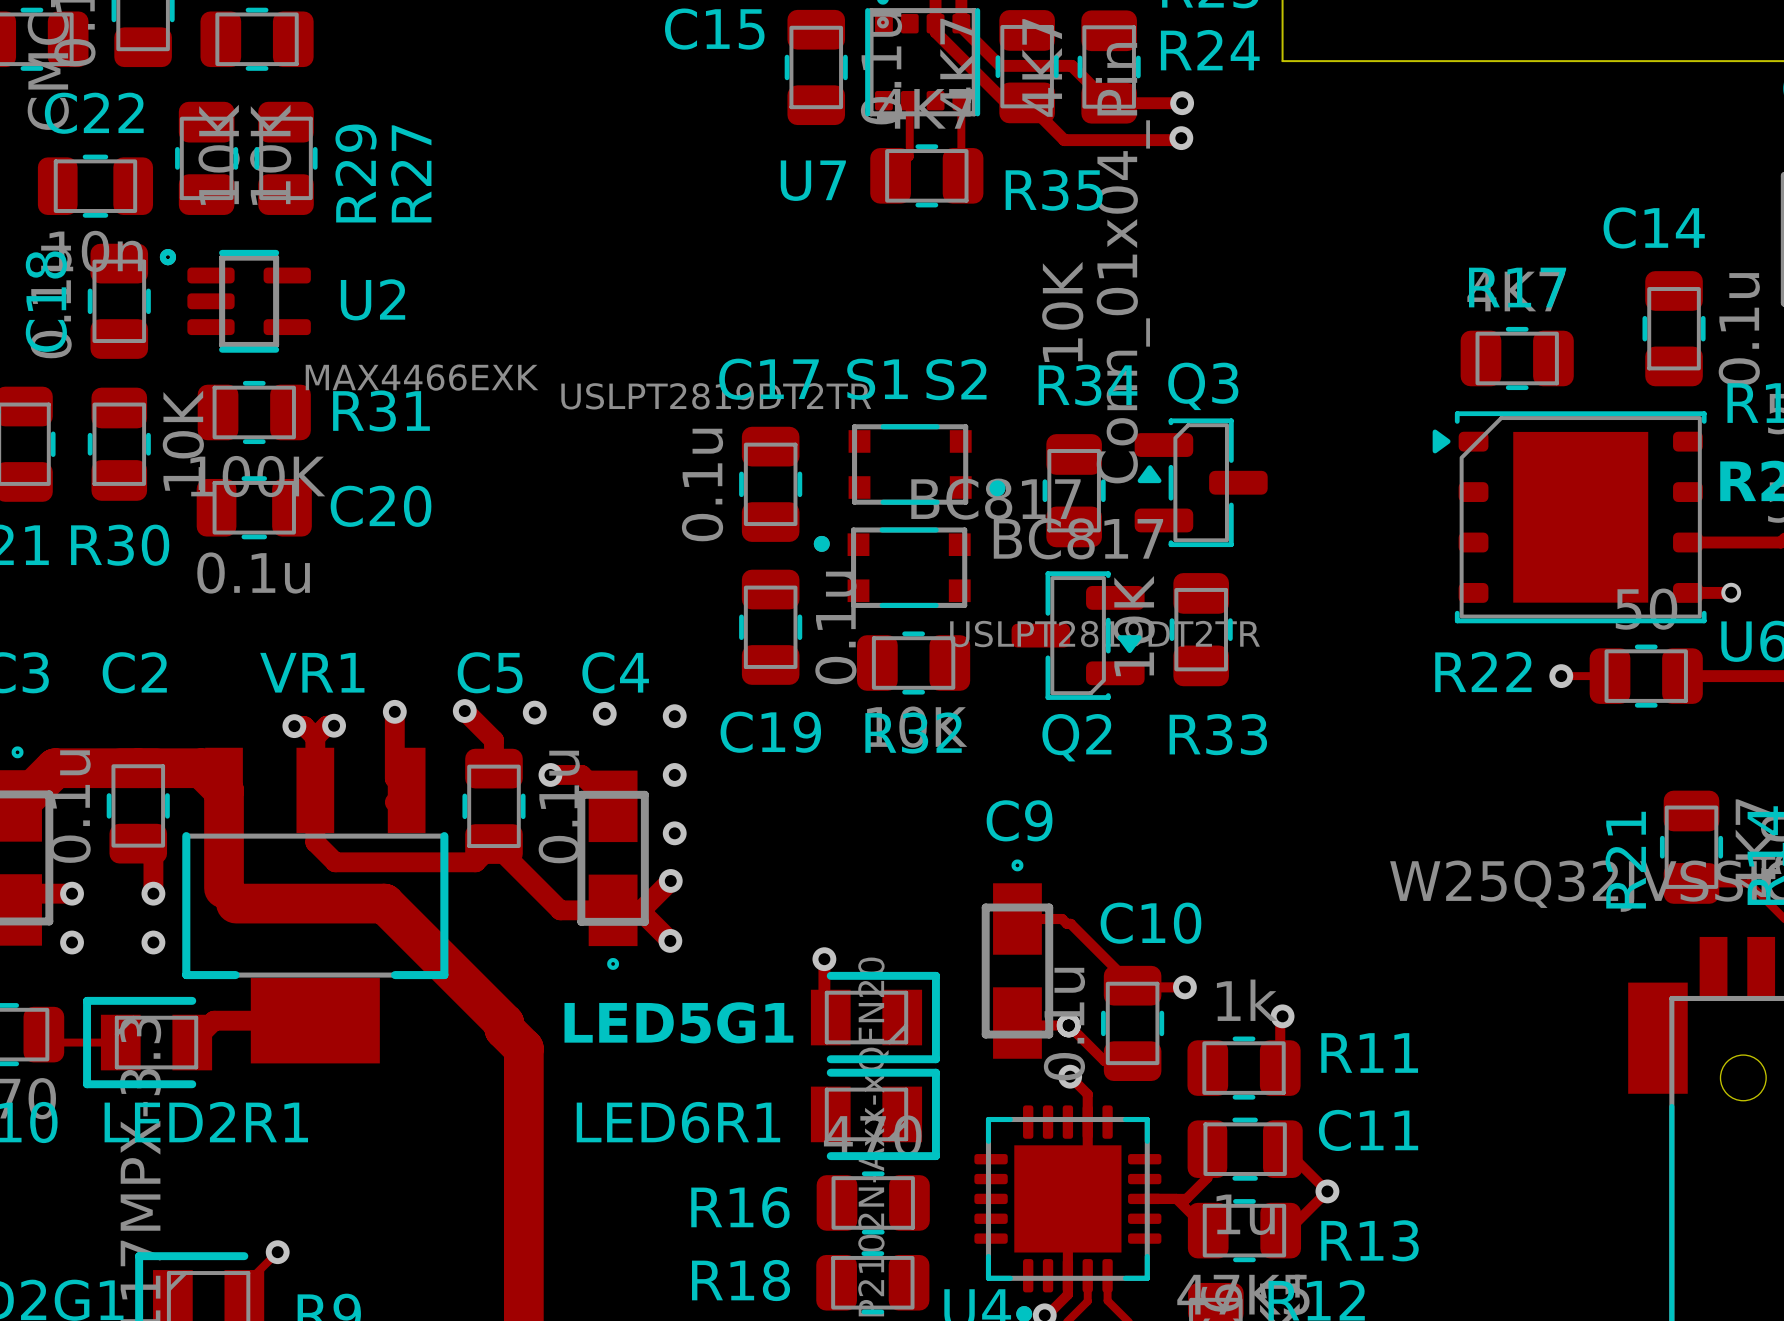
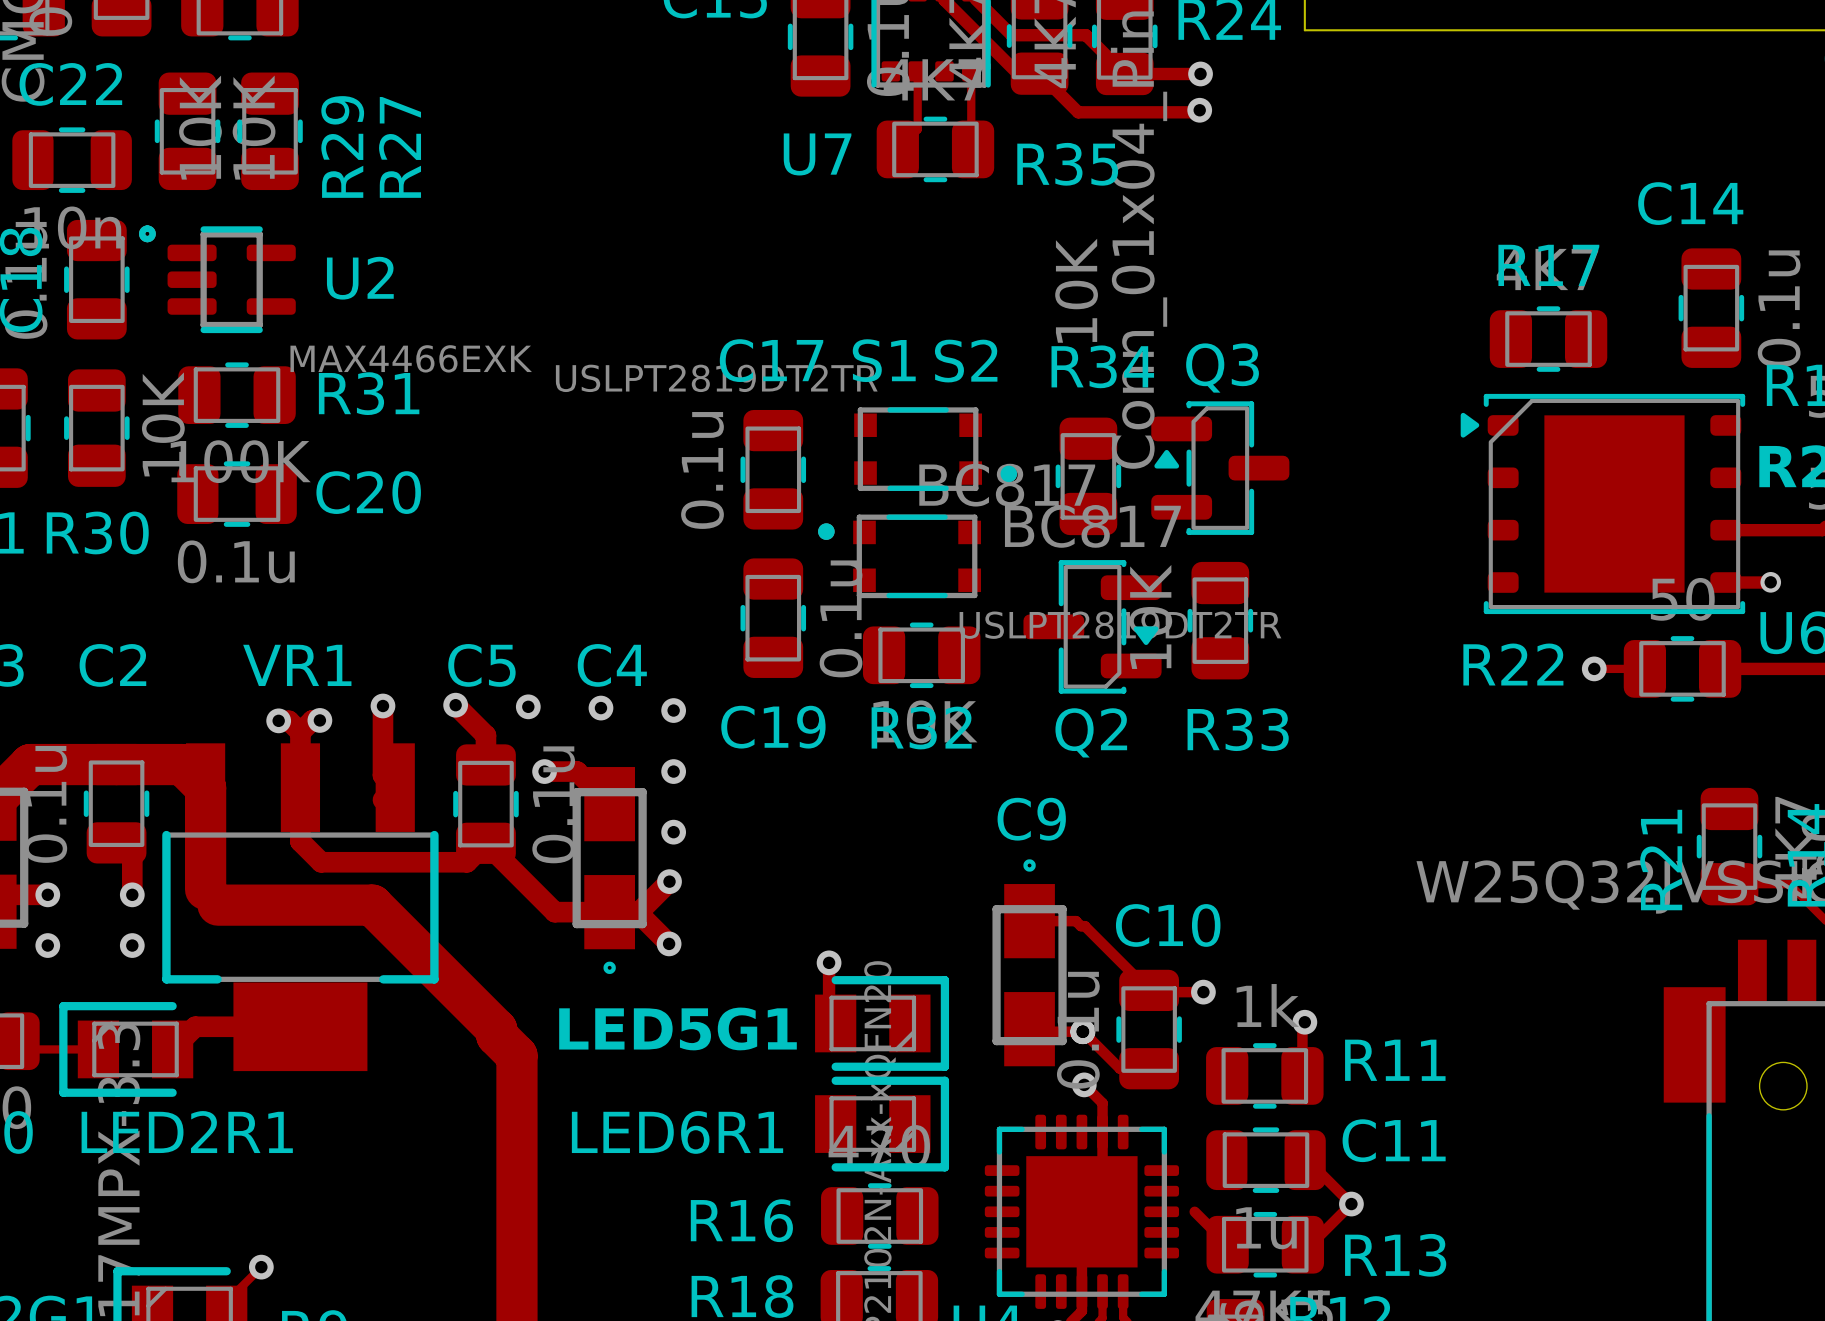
track: (1207, 1149) (1207, 1177) (1186, 1198) (1144, 1198) -> none

